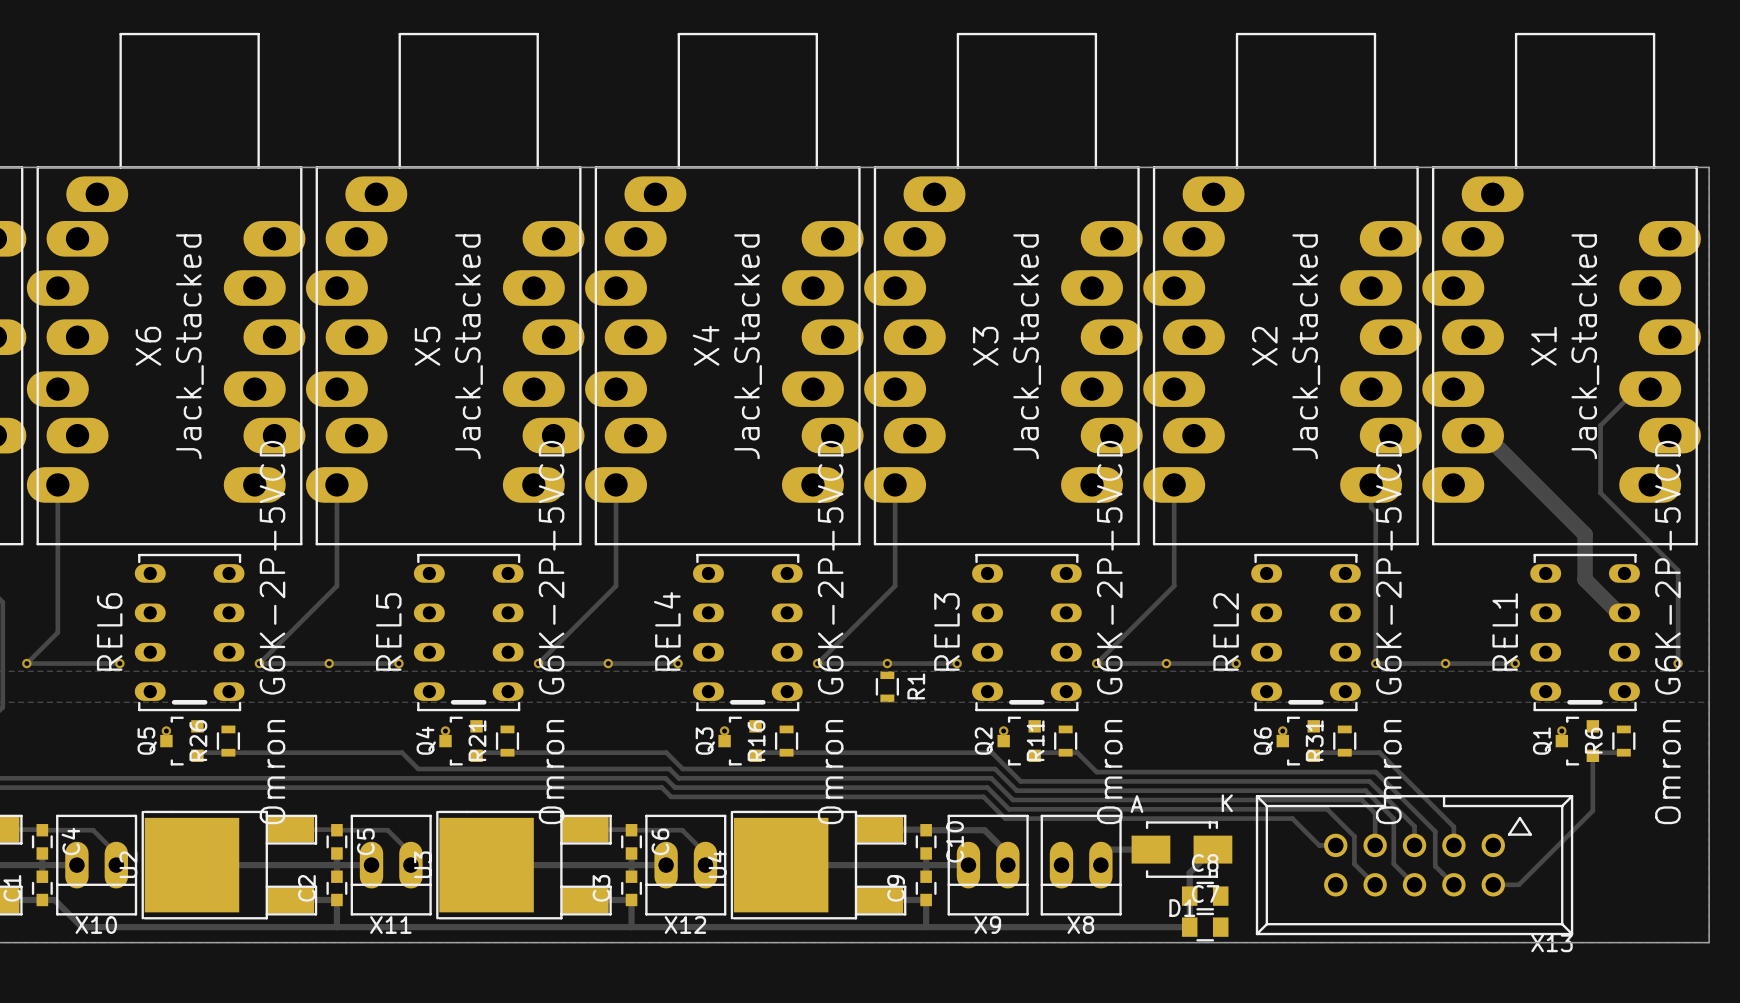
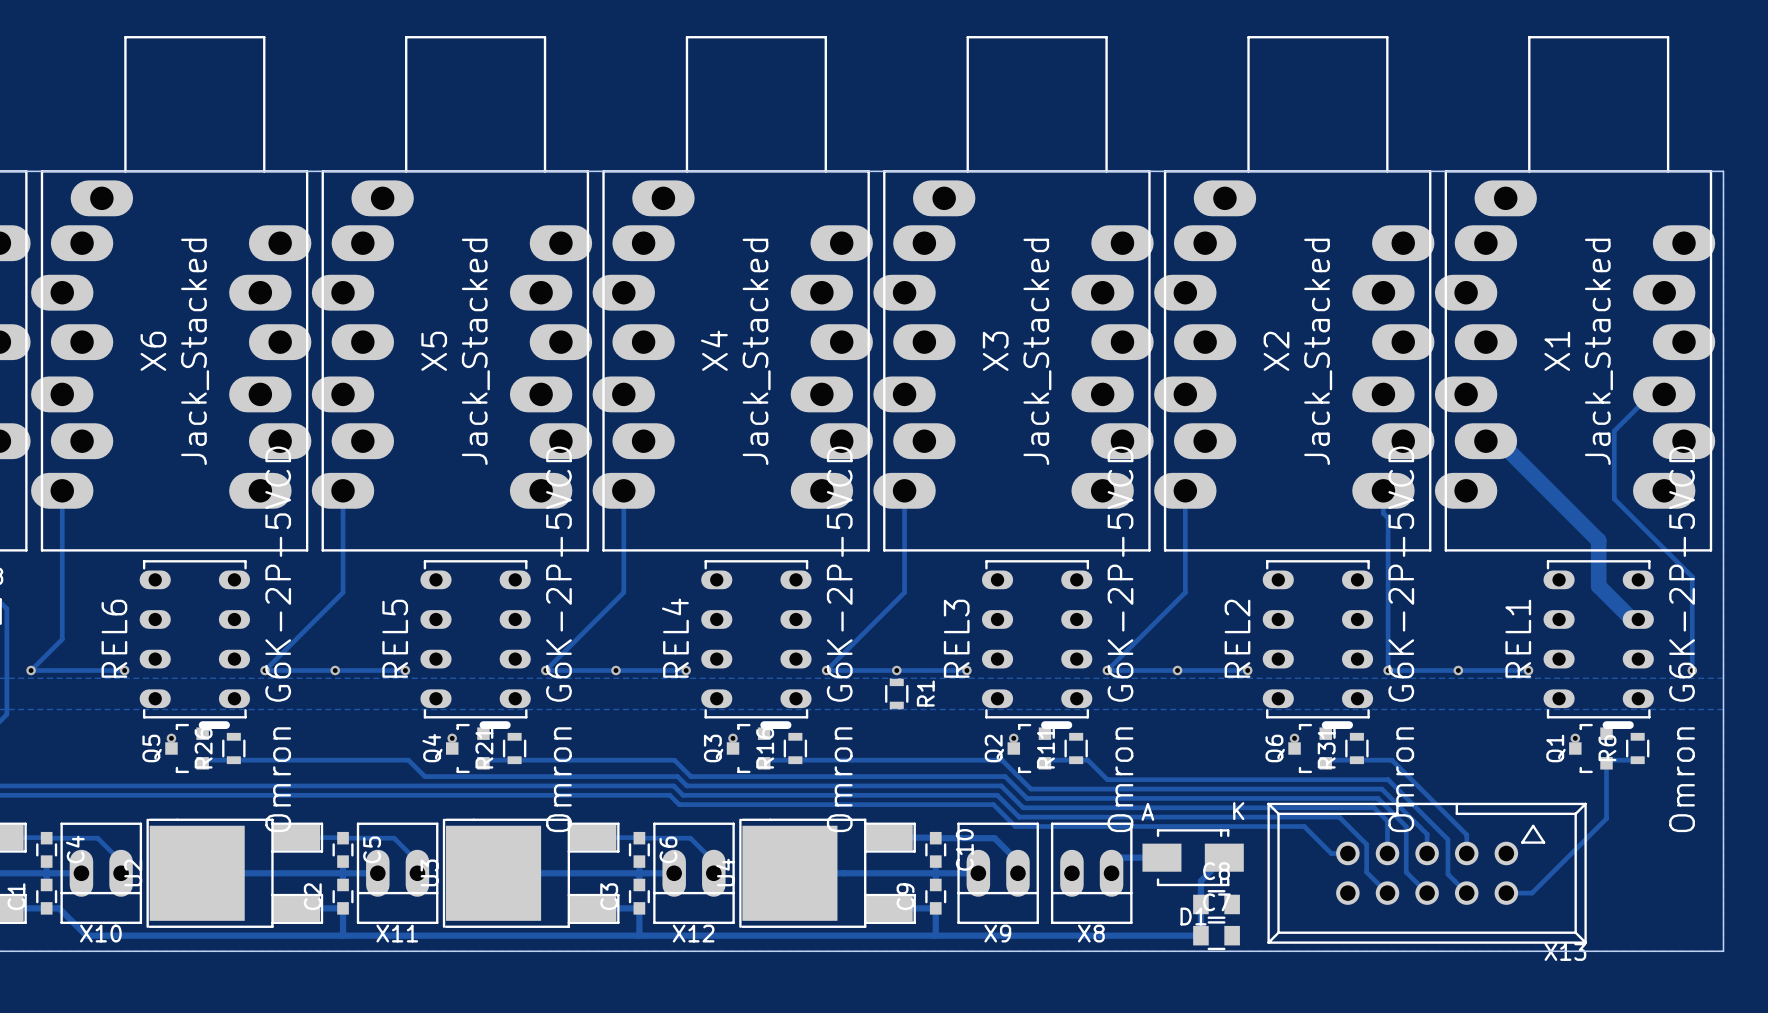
REL6 footprint: [134, 553, 245, 712] -> [139, 560, 251, 729]
REL5 footprint: [413, 553, 524, 712] -> [420, 560, 531, 729]
REL4 footprint: [692, 553, 803, 712] -> [701, 560, 812, 729]
REL3 footprint: [972, 553, 1082, 712] -> [981, 560, 1093, 729]
REL2 footprint: [1251, 553, 1361, 712] -> [1262, 560, 1374, 729]
REL1 footprint: [1530, 553, 1640, 712] -> [1543, 560, 1654, 729]

